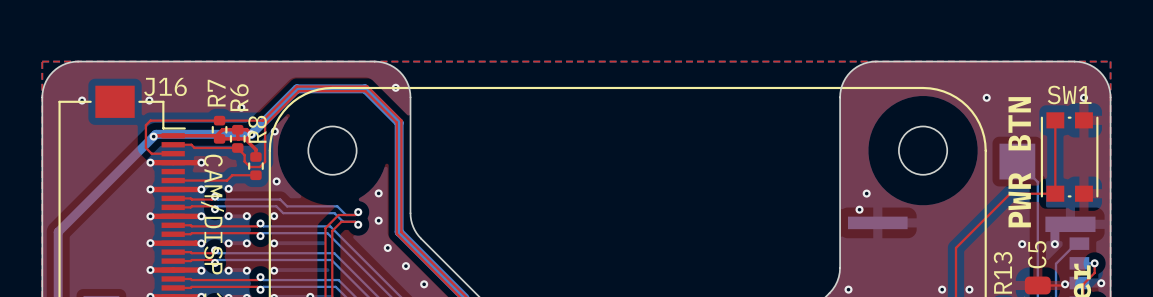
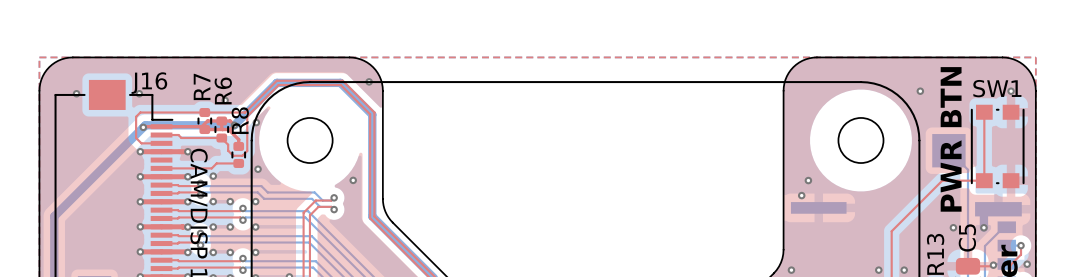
via: (378, 220) -> none
via: (387, 247) -> none
via: (405, 266) -> none
via: (424, 284) -> none

